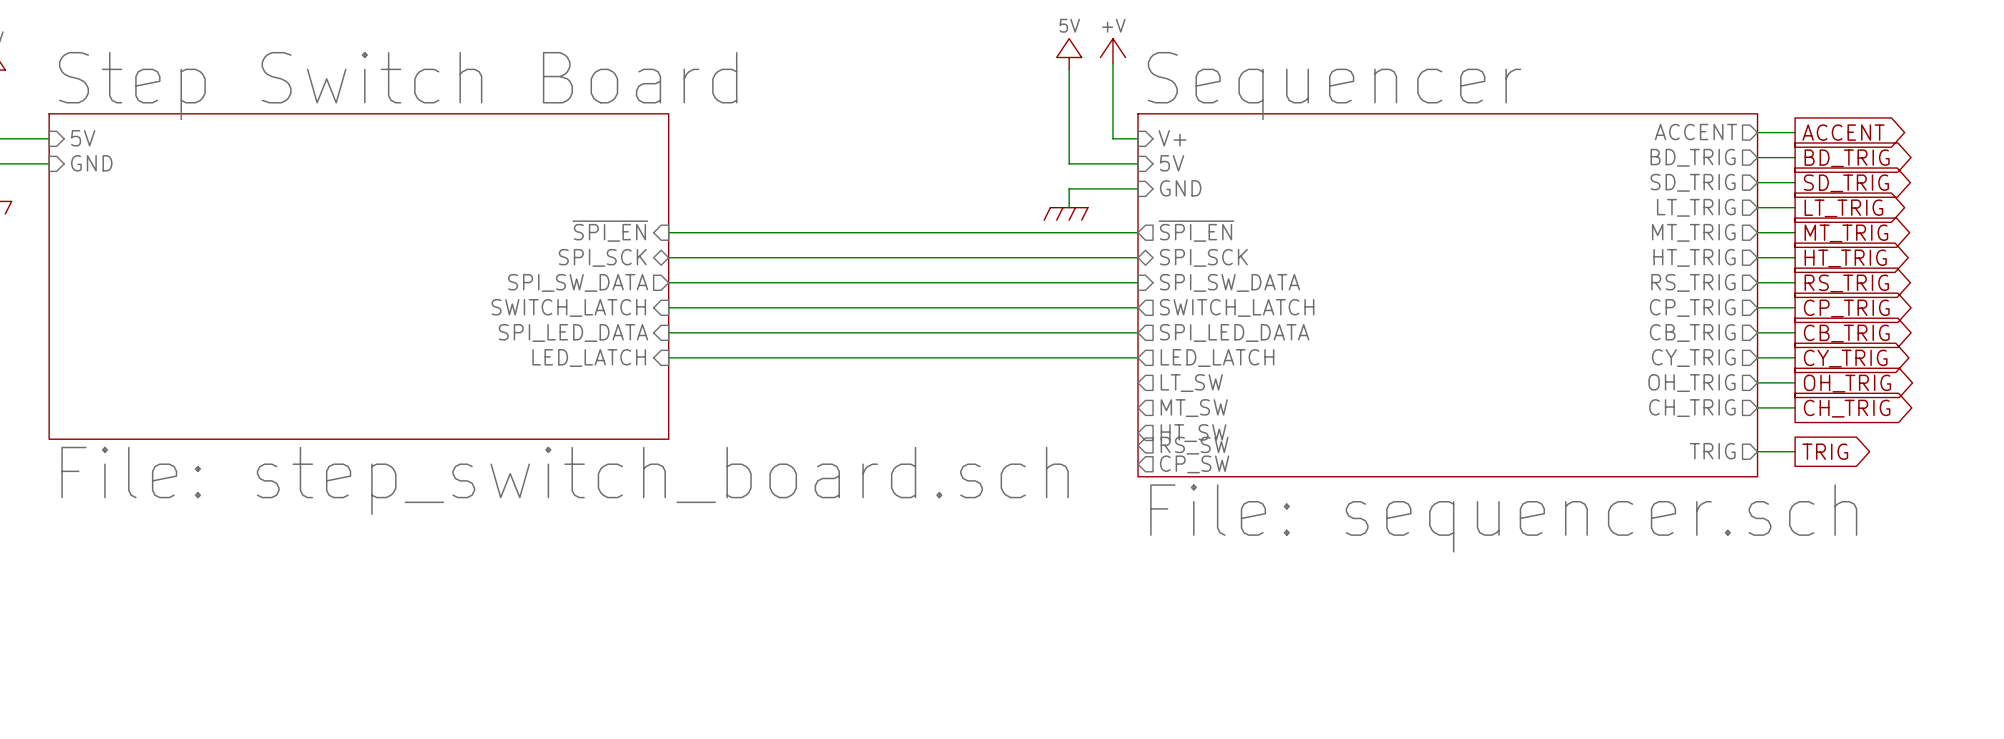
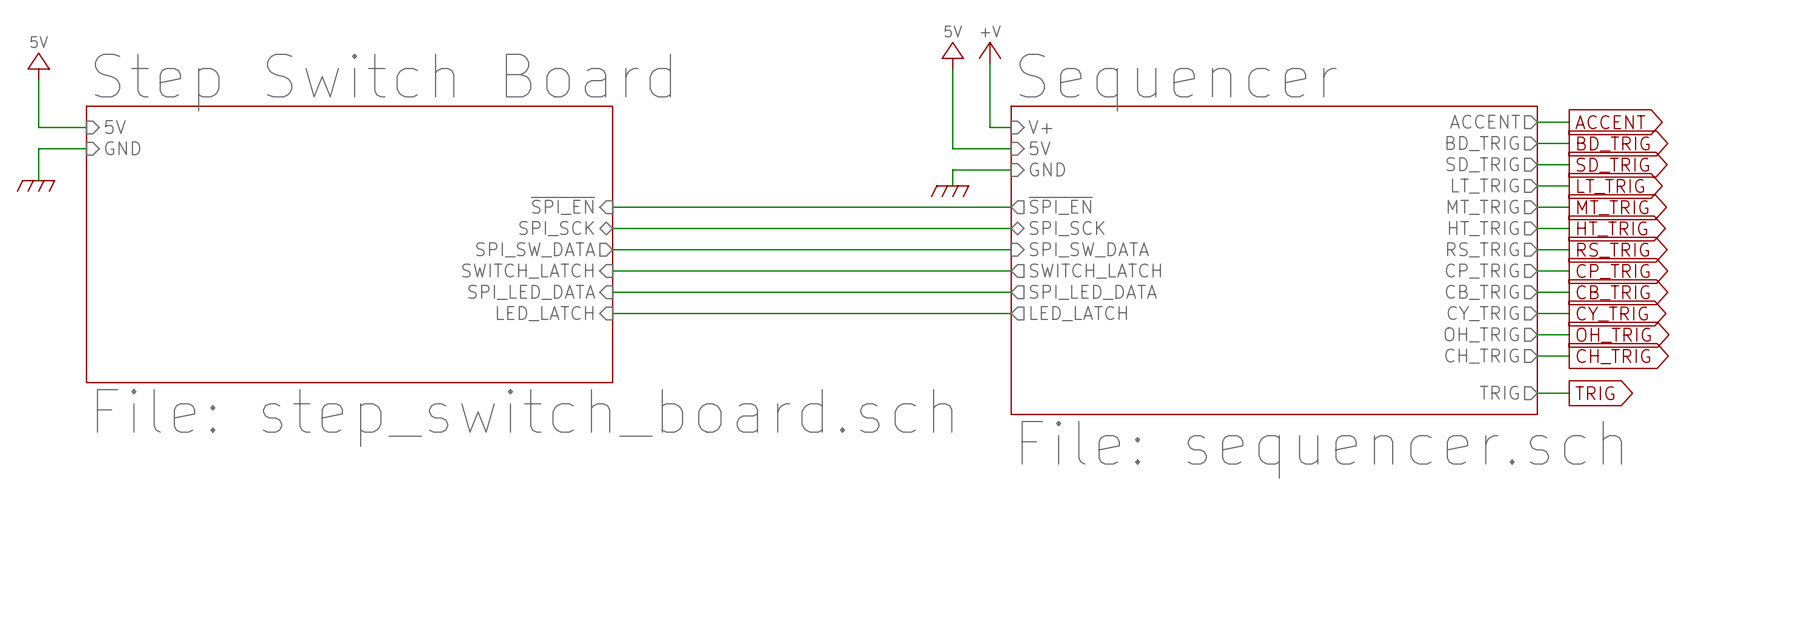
sheet pin: LT_SW (1191, 383) -> none
sheet pin: MT_SW (1194, 408) -> none
sheet pin: HT_SW (1193, 433) -> none
sheet pin: RS_SW (1194, 445) -> none
sheet pin: CP_SW (1194, 464) -> none

